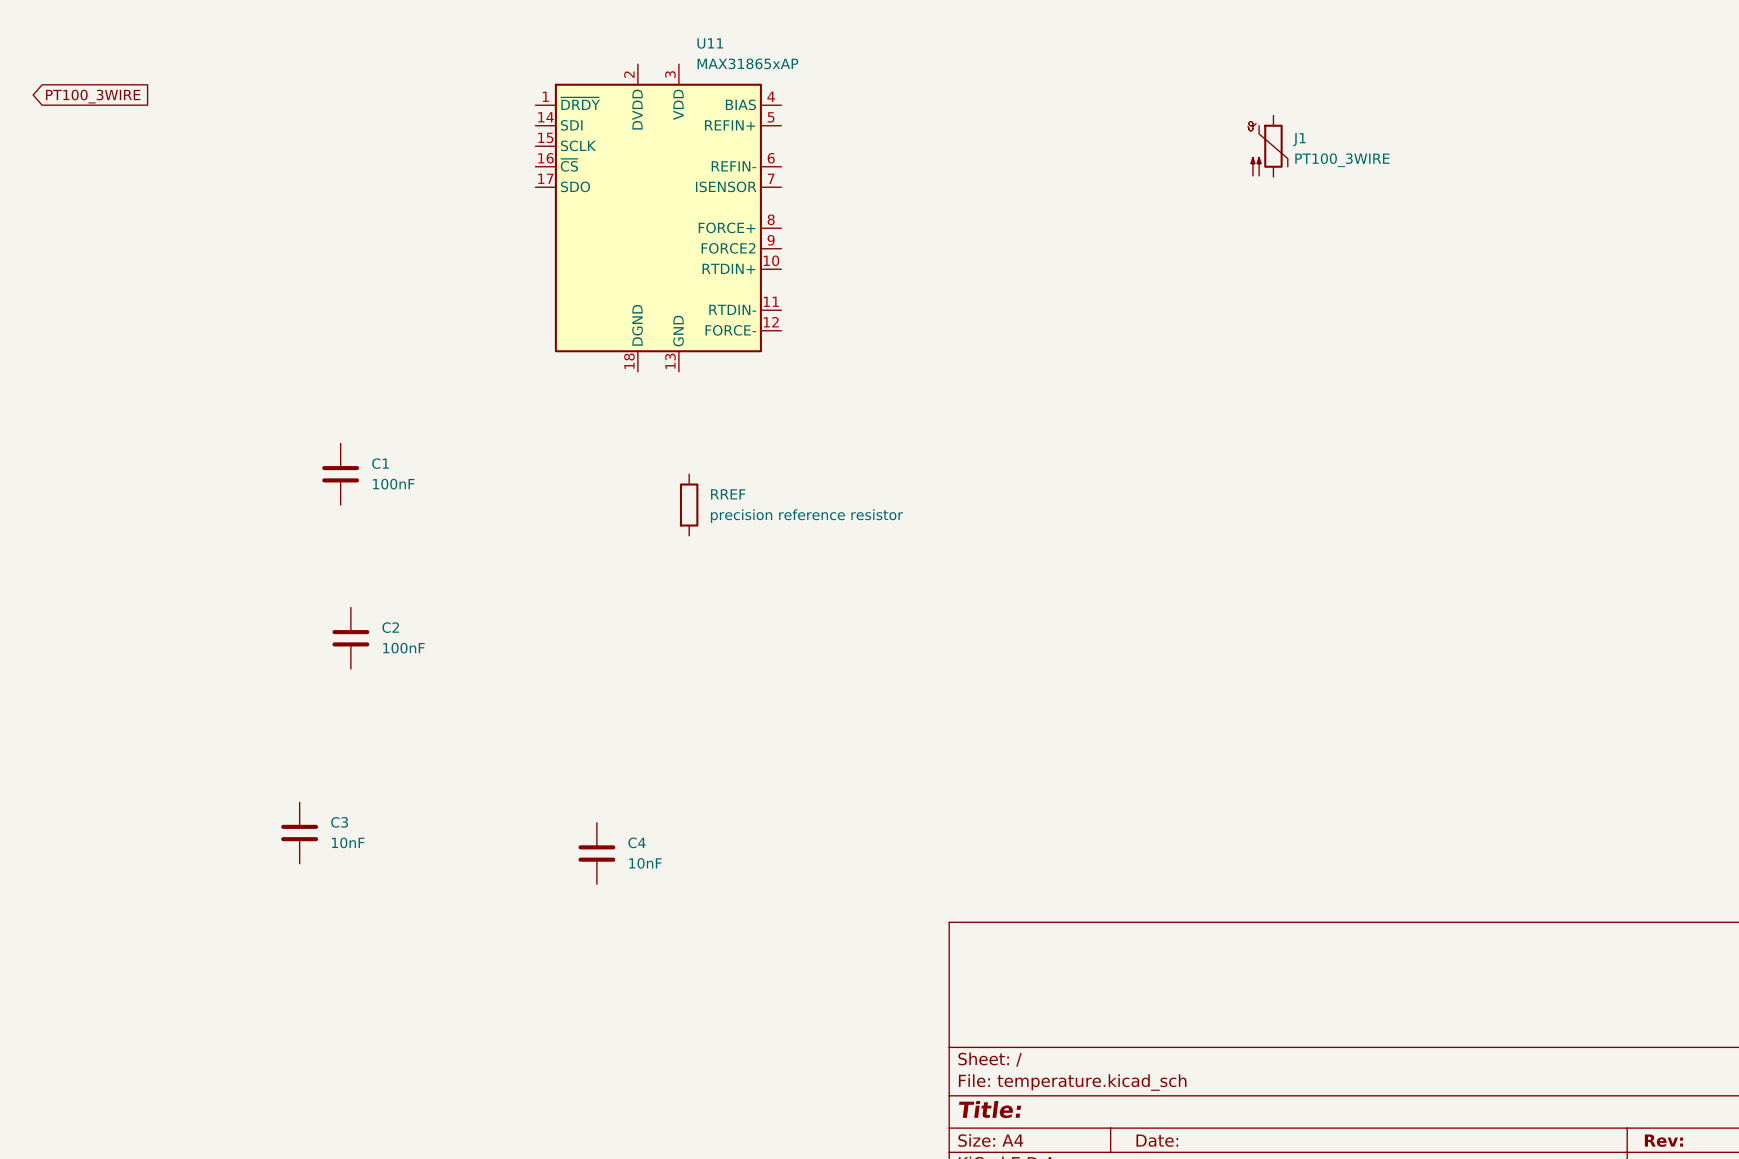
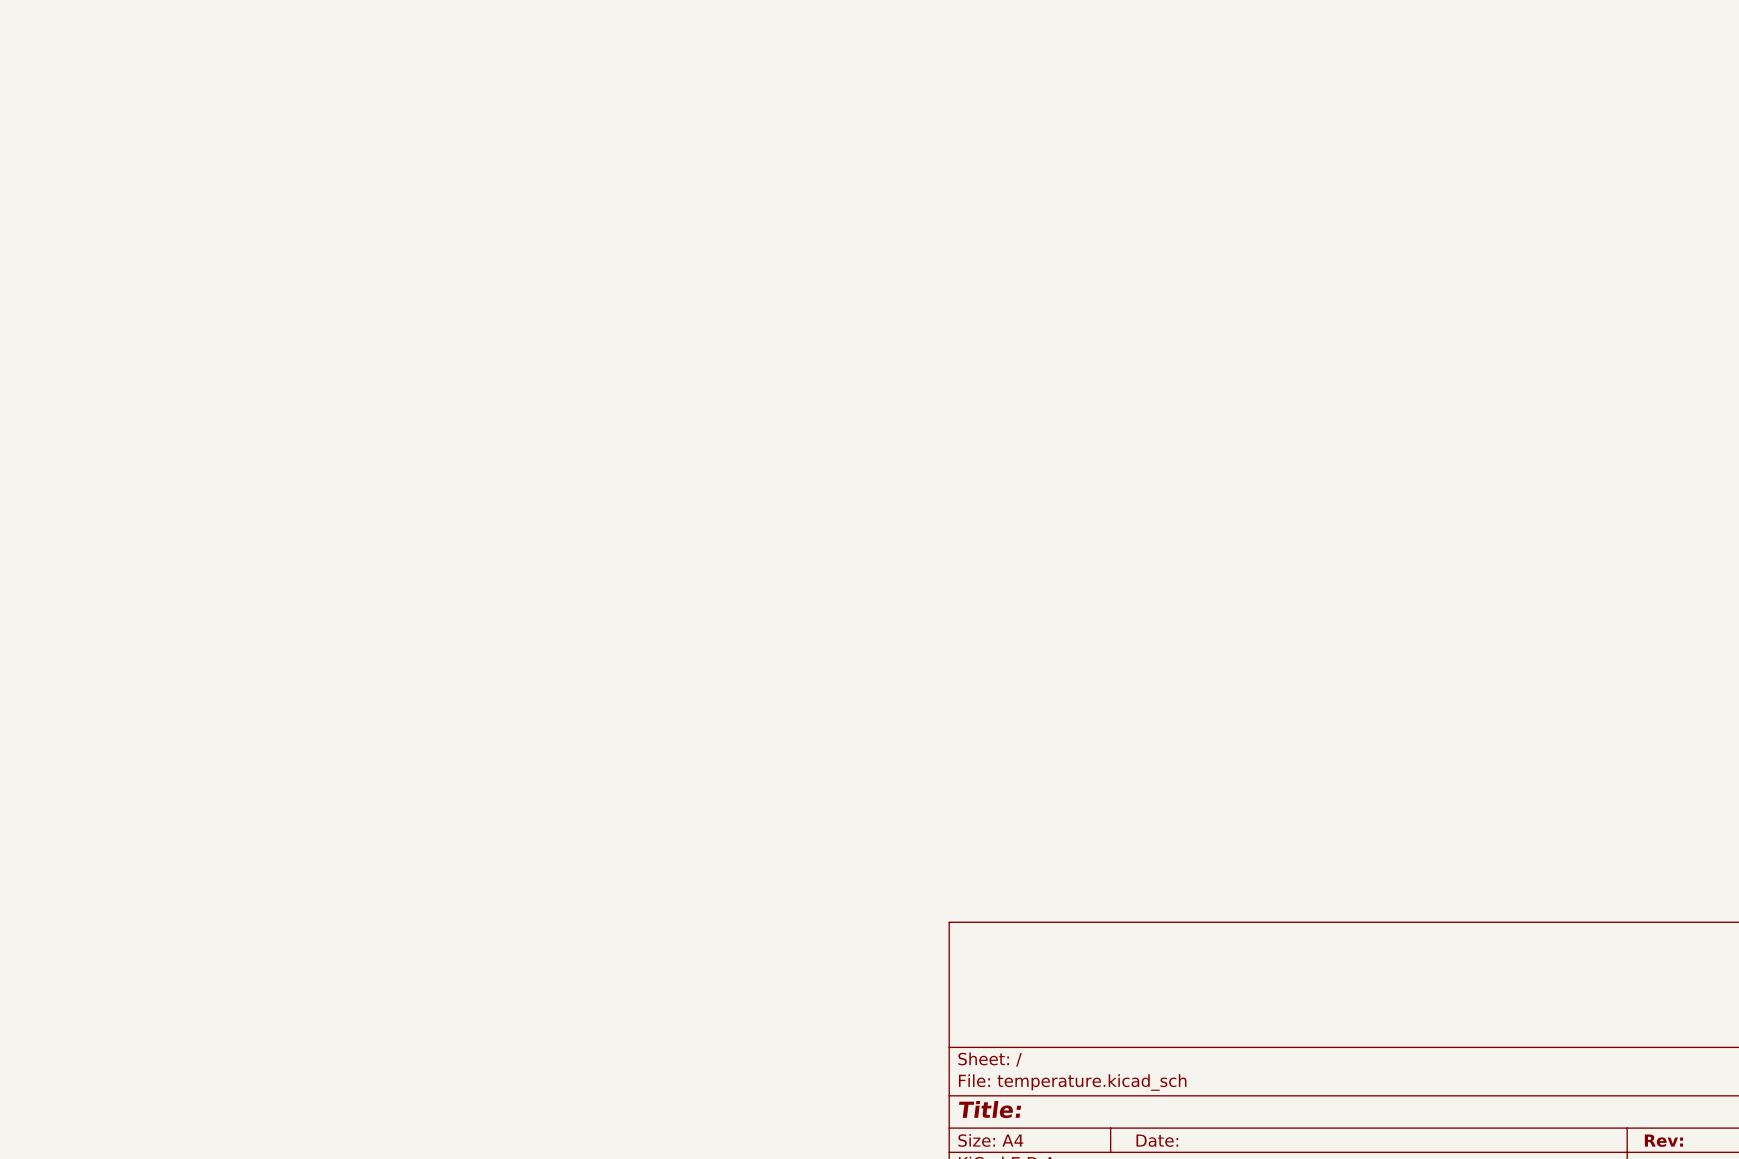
global label: PT100_3WIRE (93, 96) -> none
J1: PT100_3WIRE (1267, 146) -> none
U11: MAX31865xAP (658, 217) -> none
C1: 100nF (340, 474) -> none
RREF: precision reference resistor (689, 505) -> none
C2: 100nF (350, 638) -> none
C3: 10nF (299, 833) -> none
C4: 10nF (596, 853) -> none

